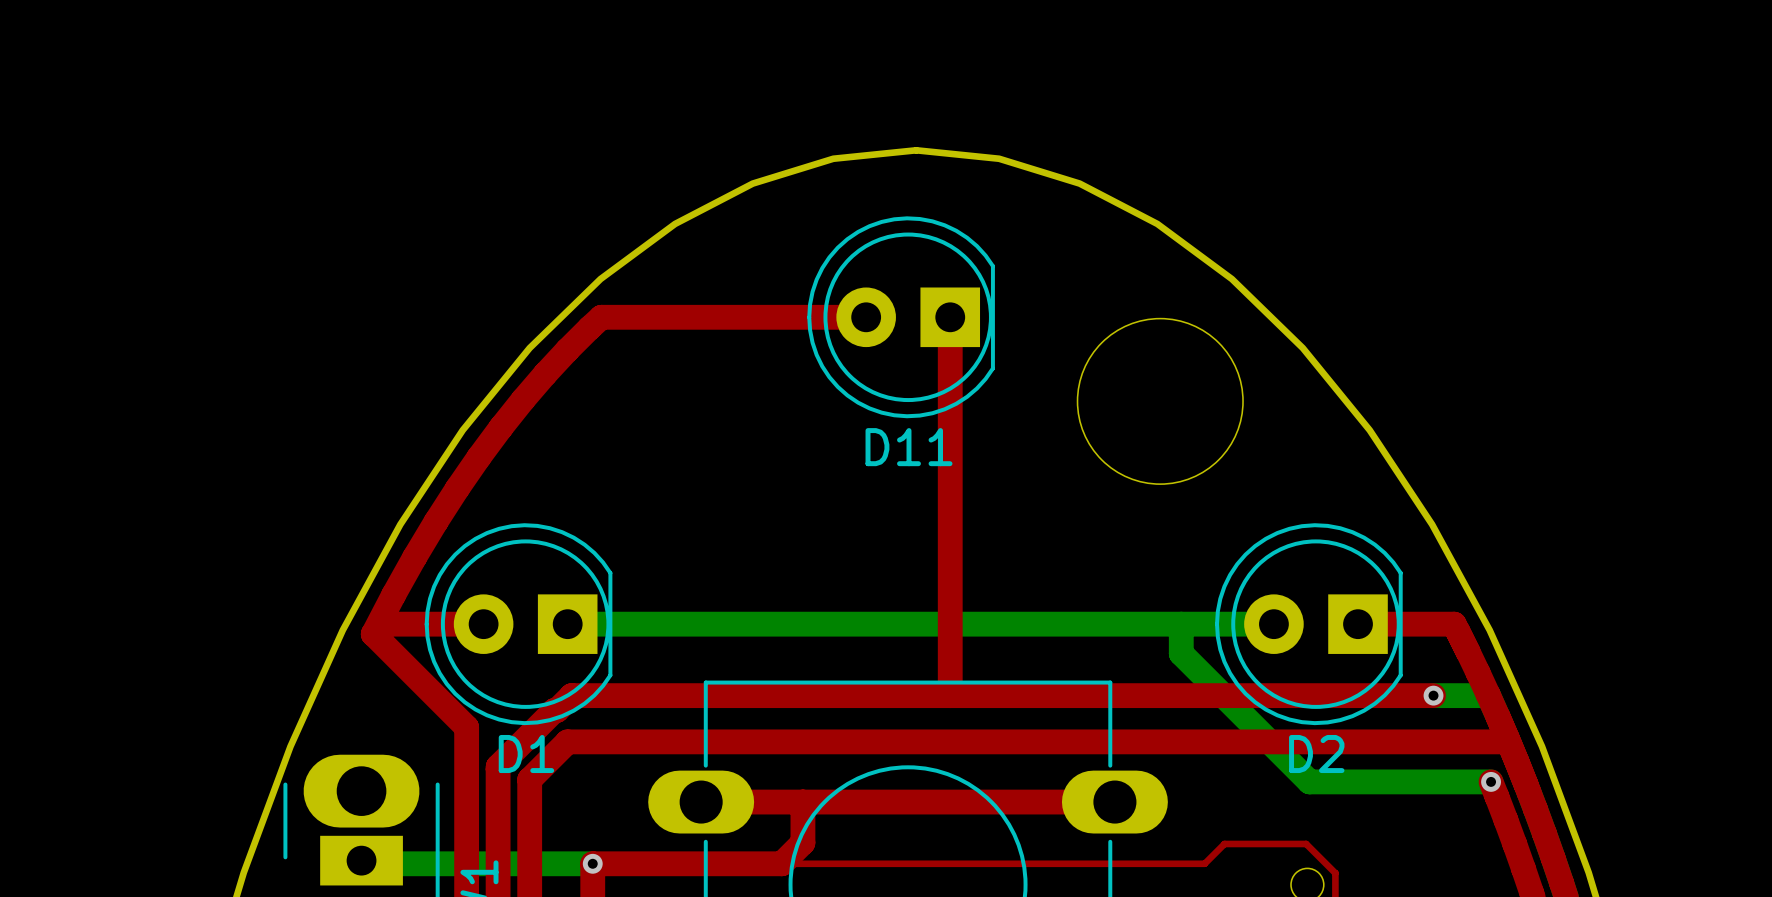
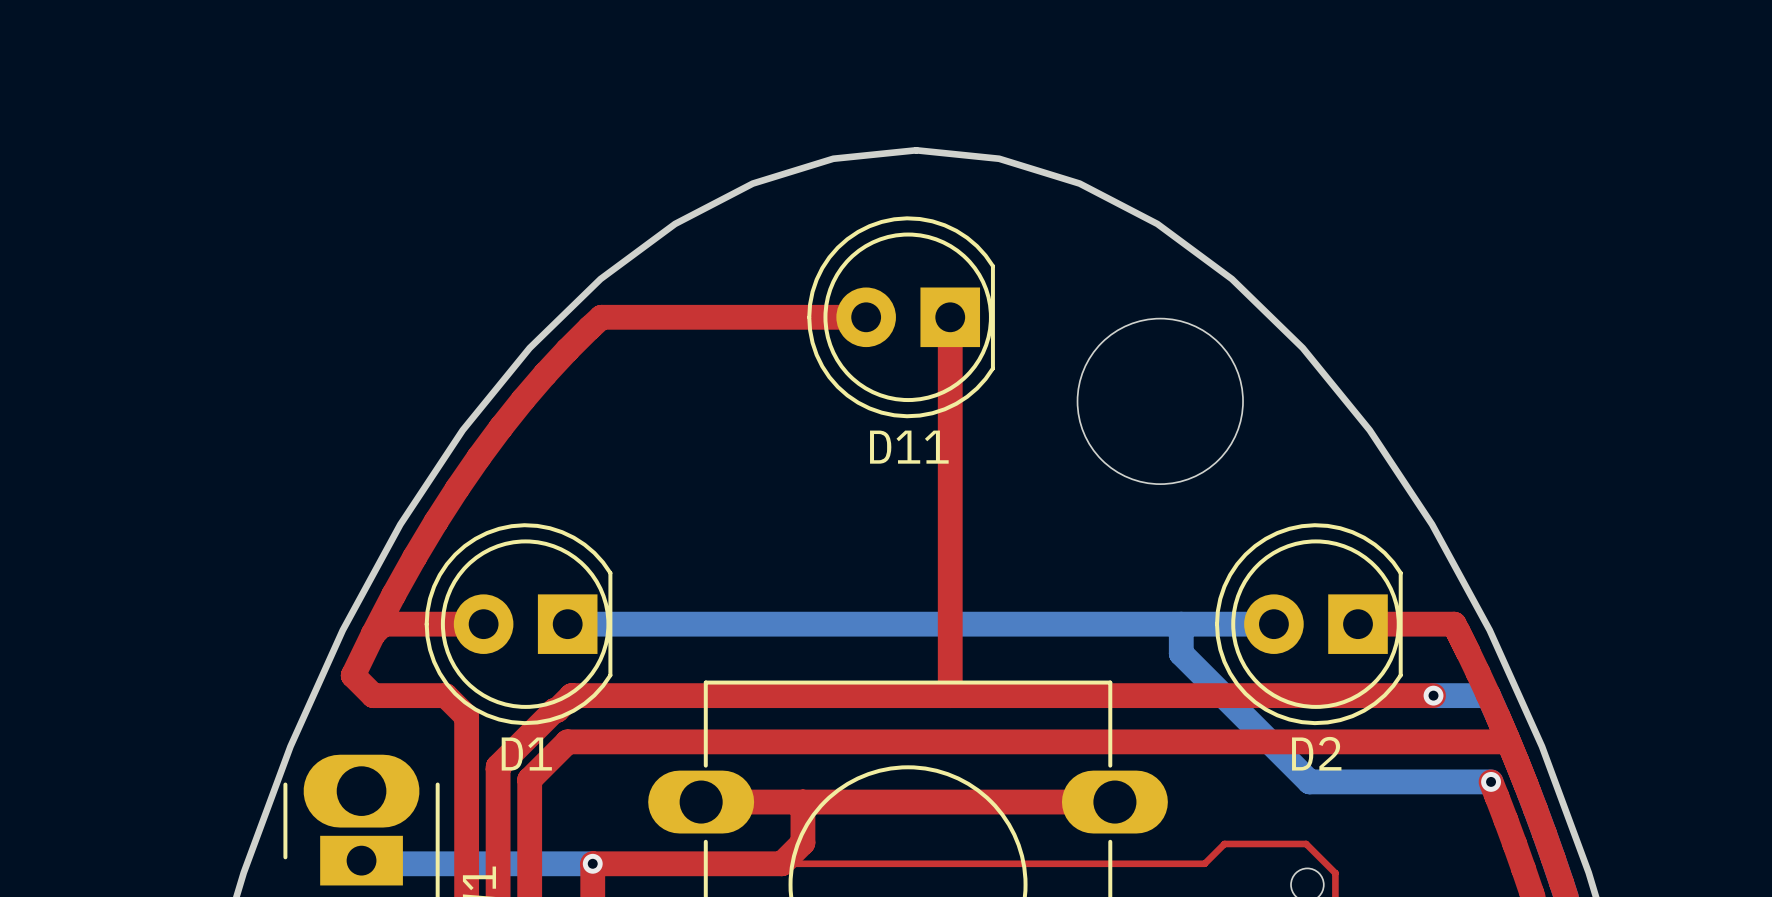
top track: (373, 634) (466, 727) -> (353, 675) (373, 695) (445, 695) (466, 716) (466, 727)
top track: none -> (373, 634) (353, 675)

